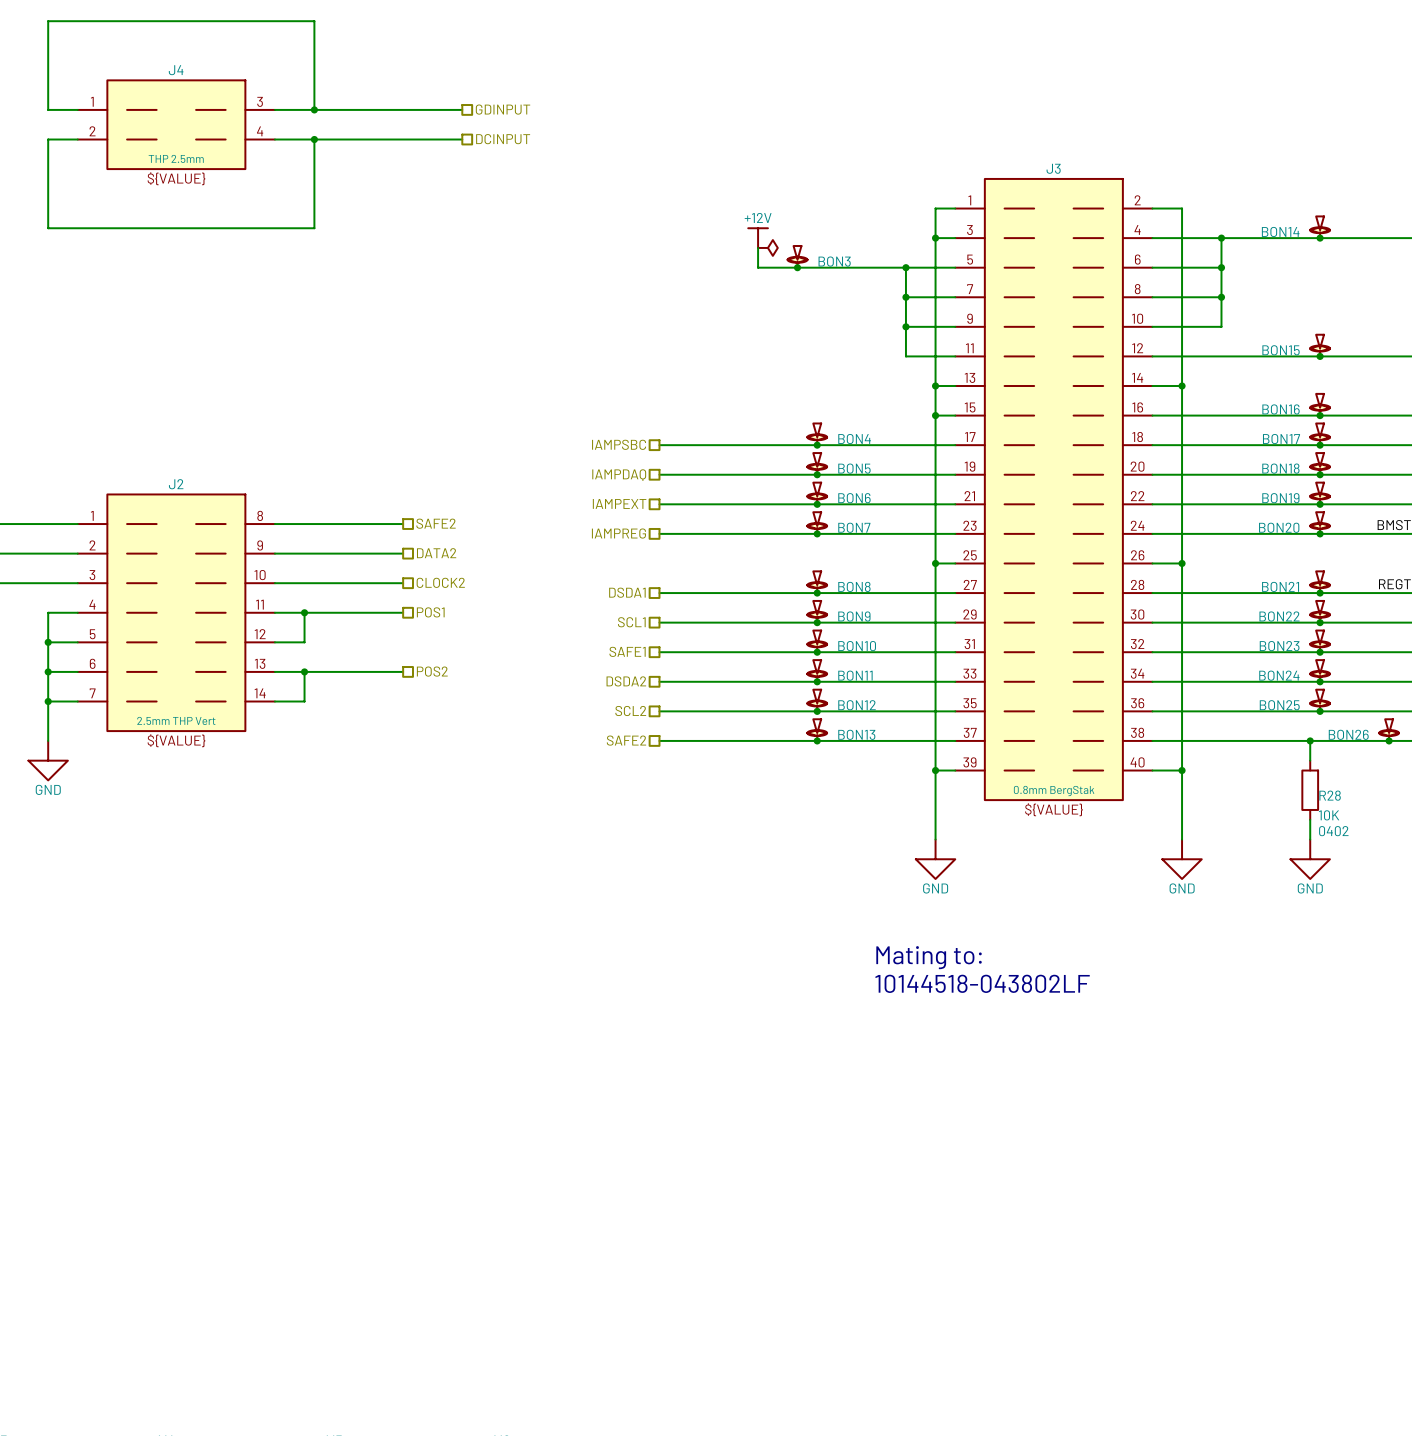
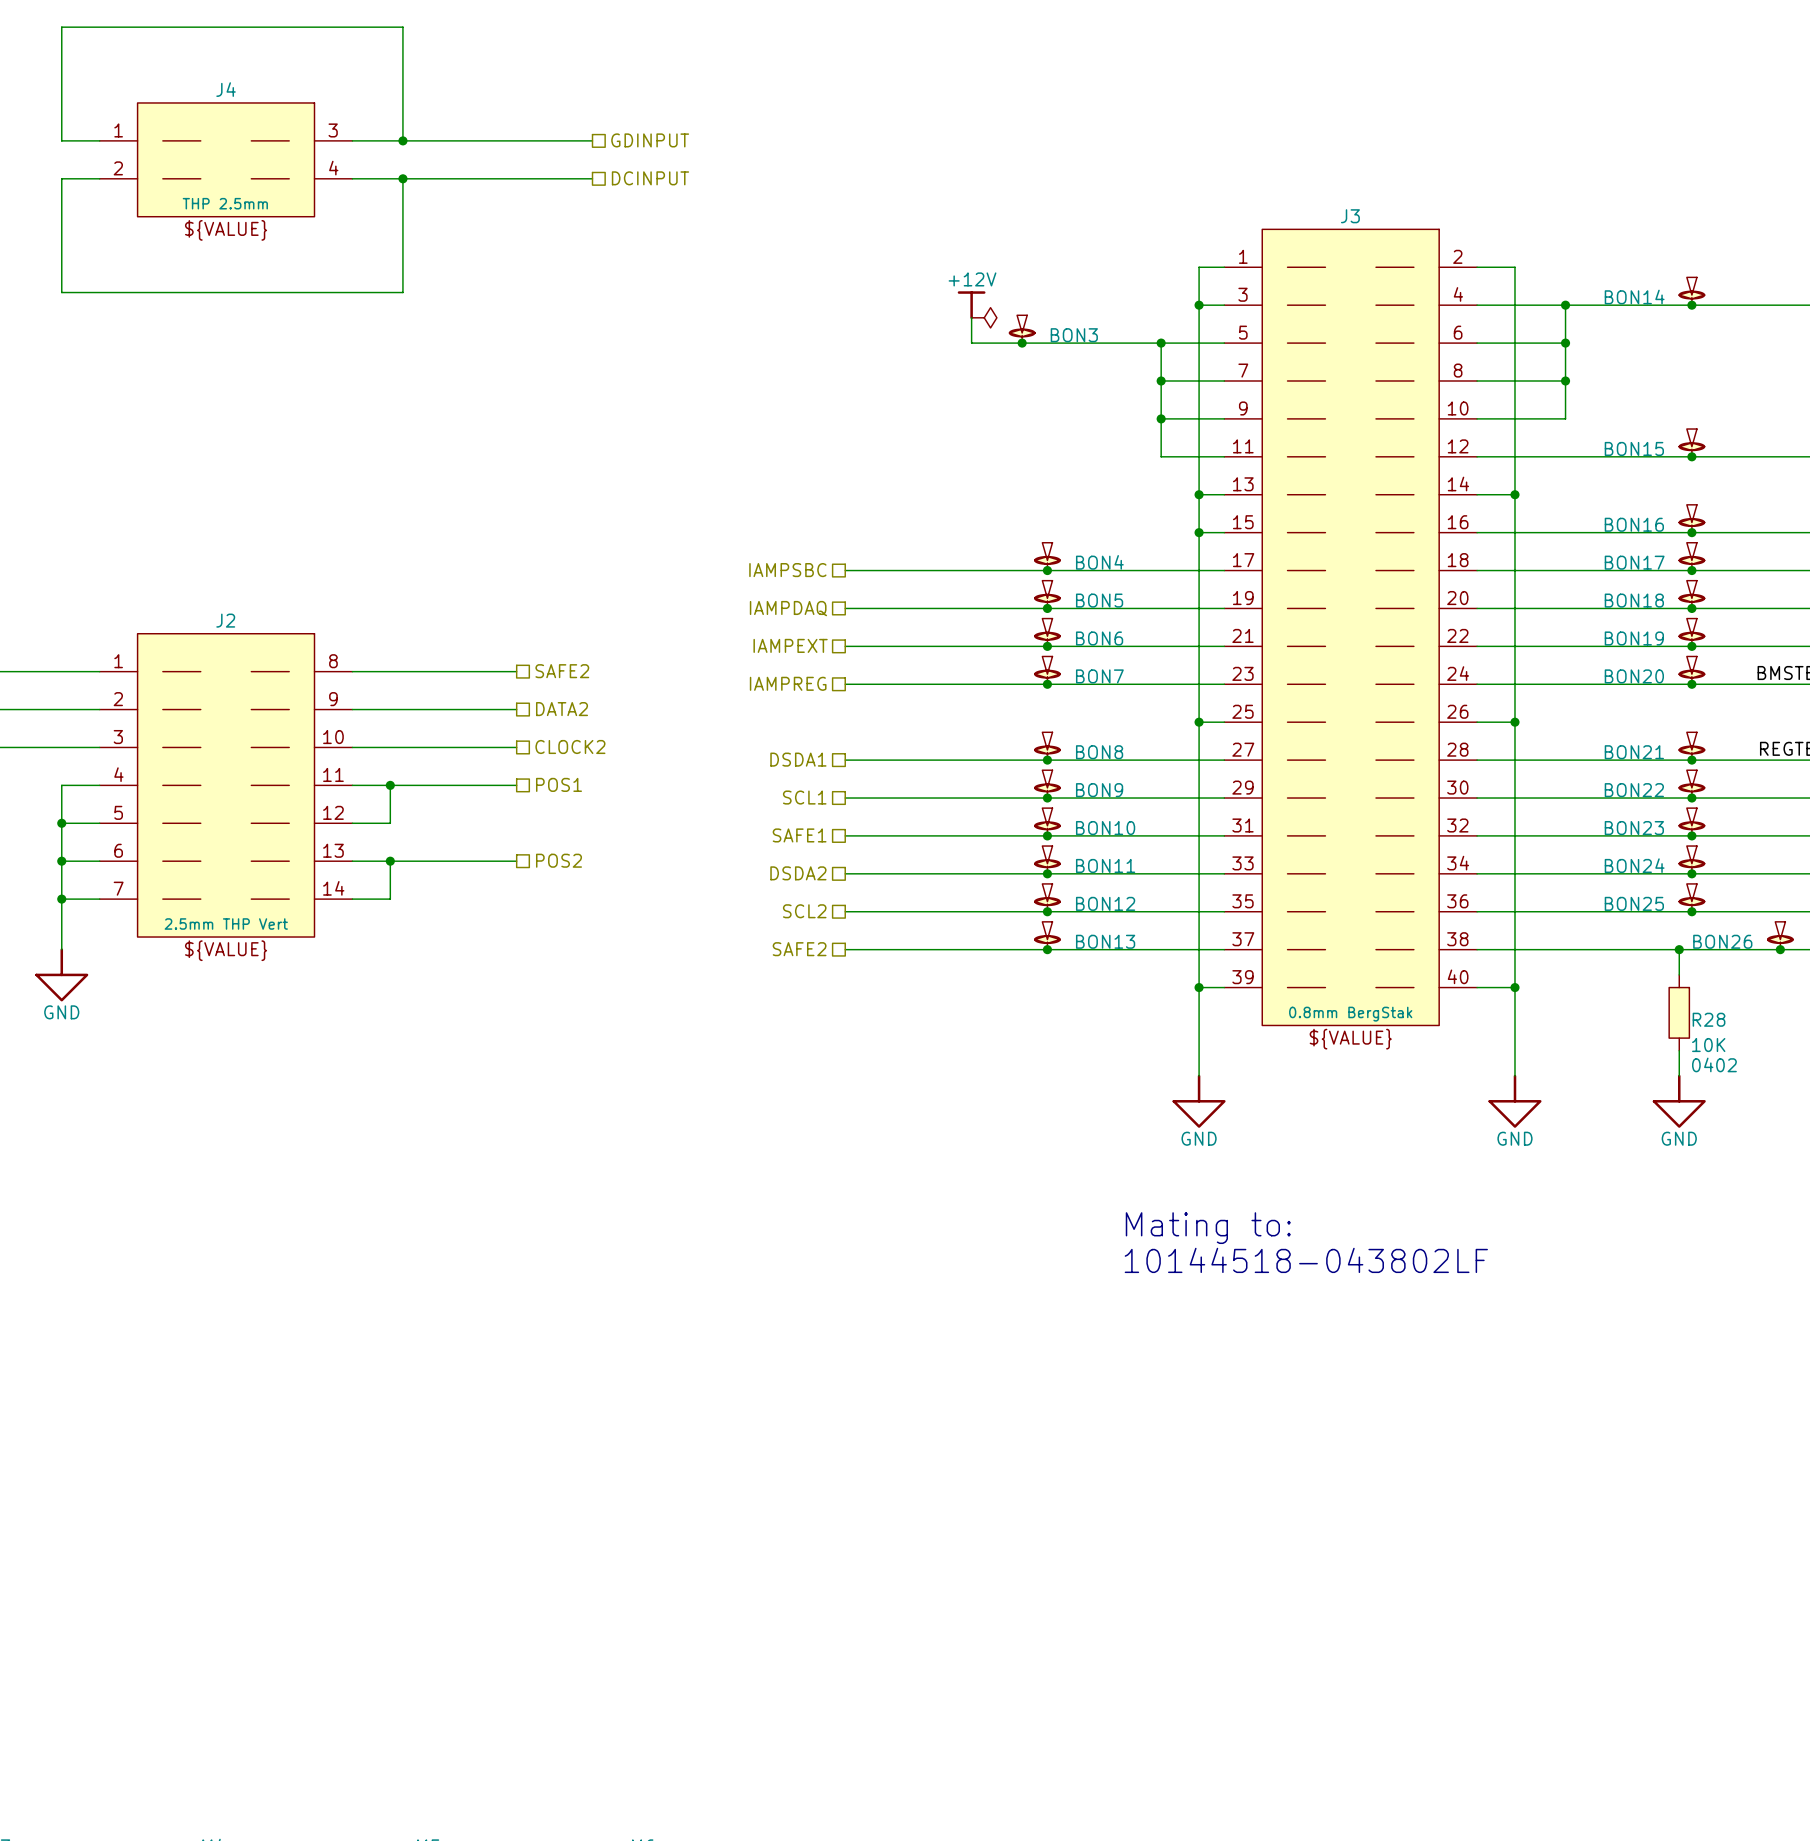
R28 symbol: [1301, 760, 1320, 820] -> [1669, 974, 1690, 1051]

